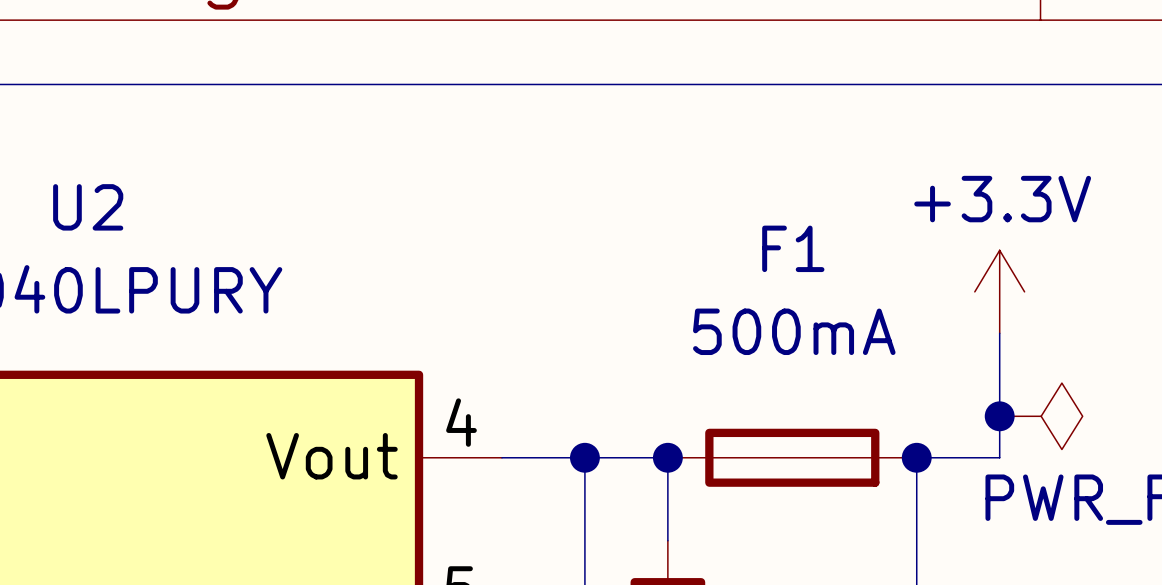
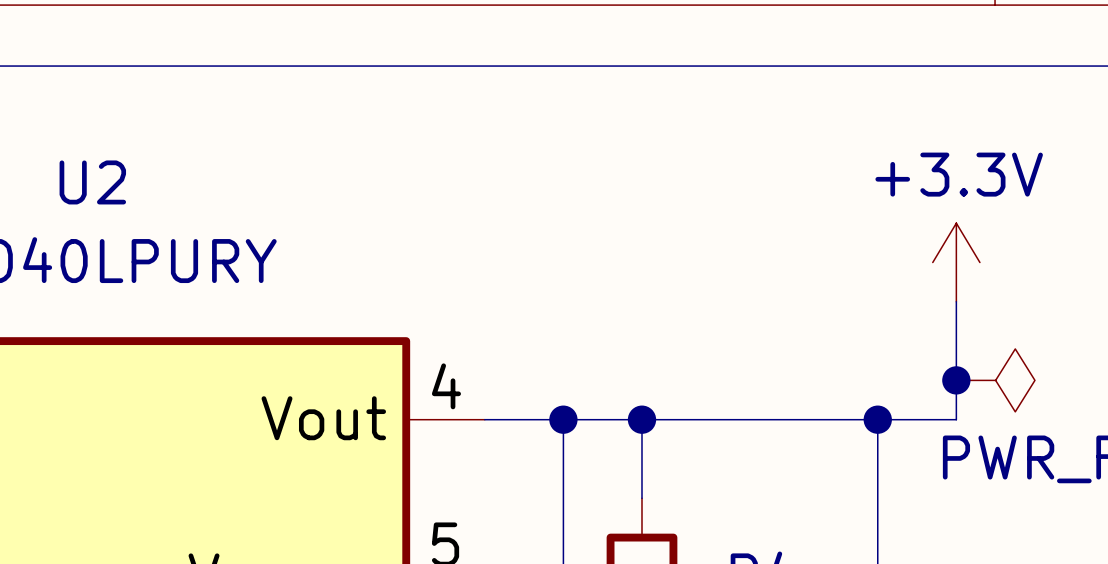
F1: 500mA (792, 457) -> none

